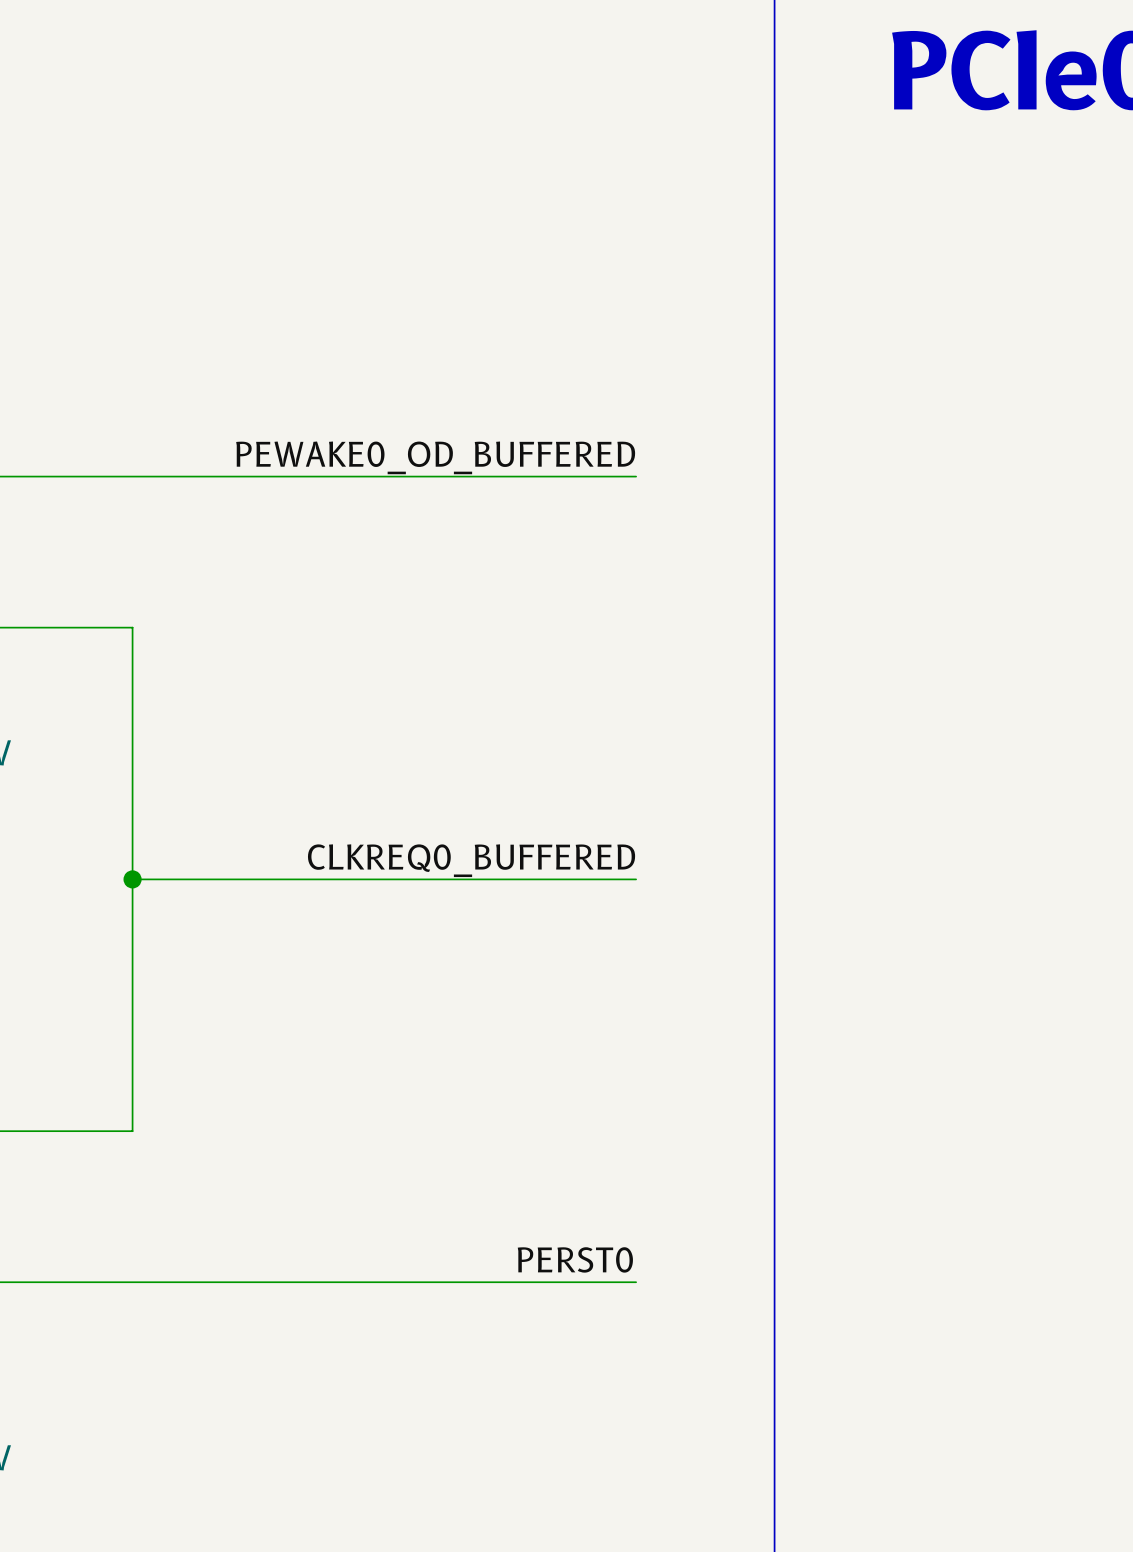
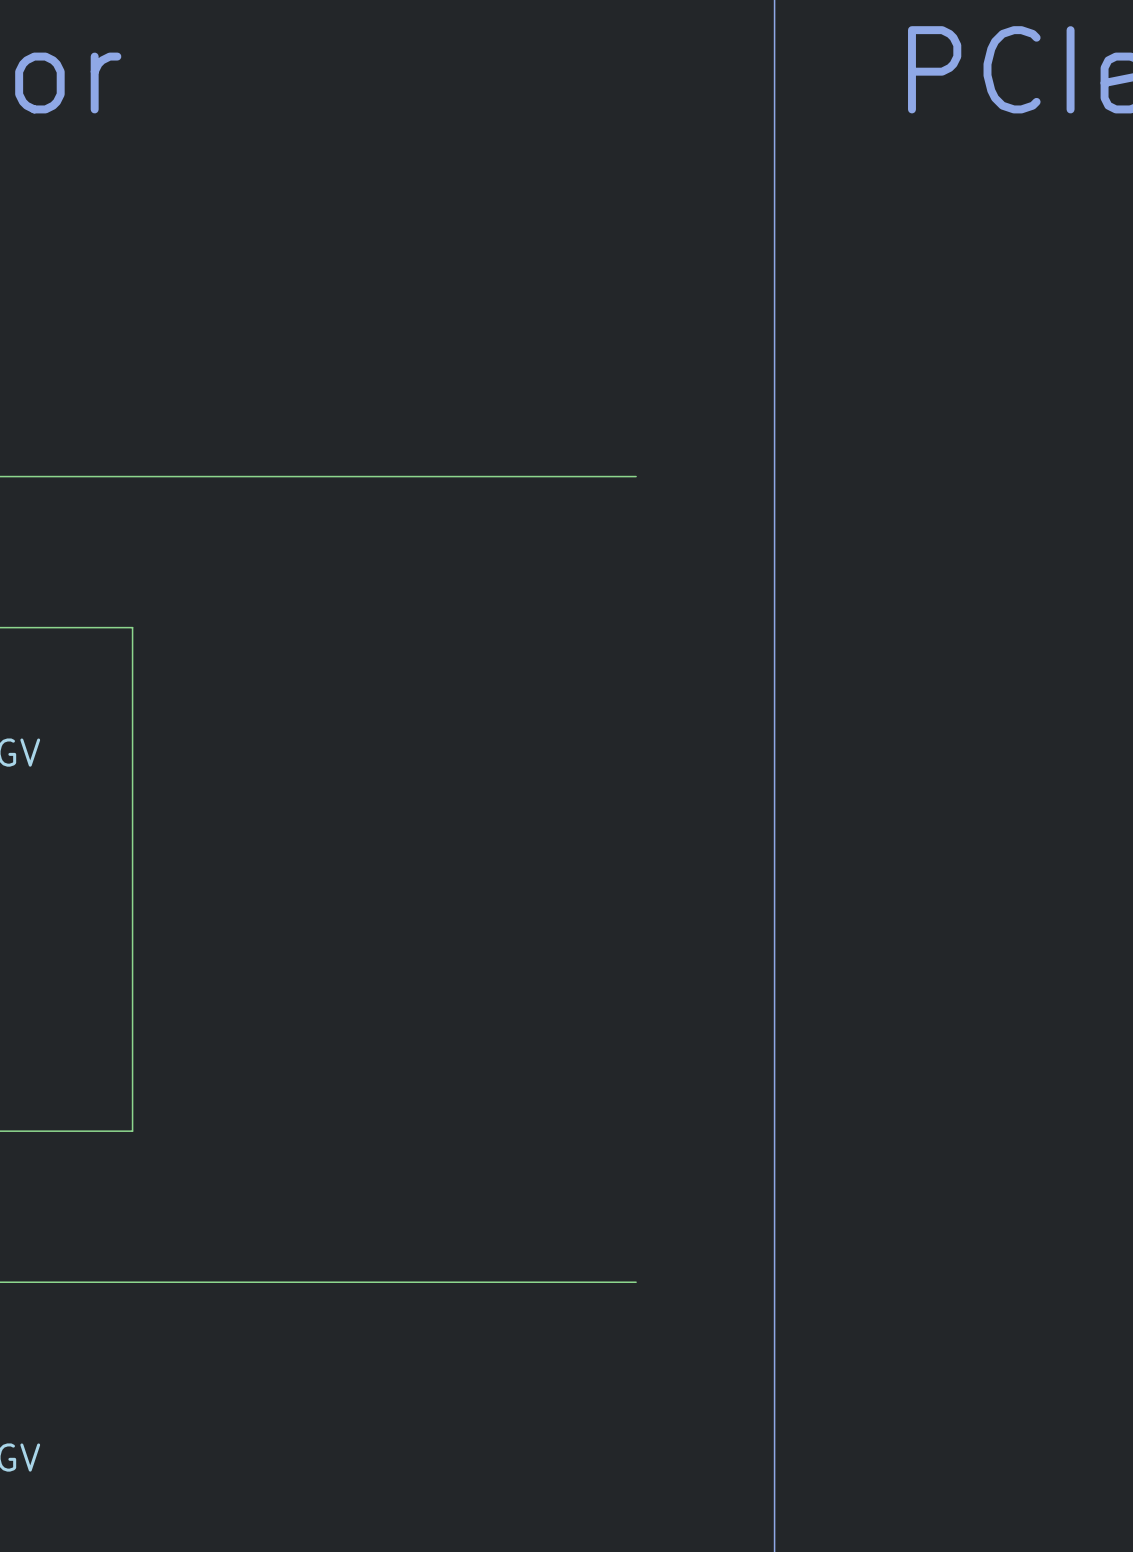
label: PEWAKE0_OD_BUFFERED (435, 457) -> none
label: CLKREQ0_BUFFERED (471, 860) -> none
wire: (132, 879) (636, 879) -> none
junction: (132, 879) -> none
label: PERST0 (575, 1259) -> none

